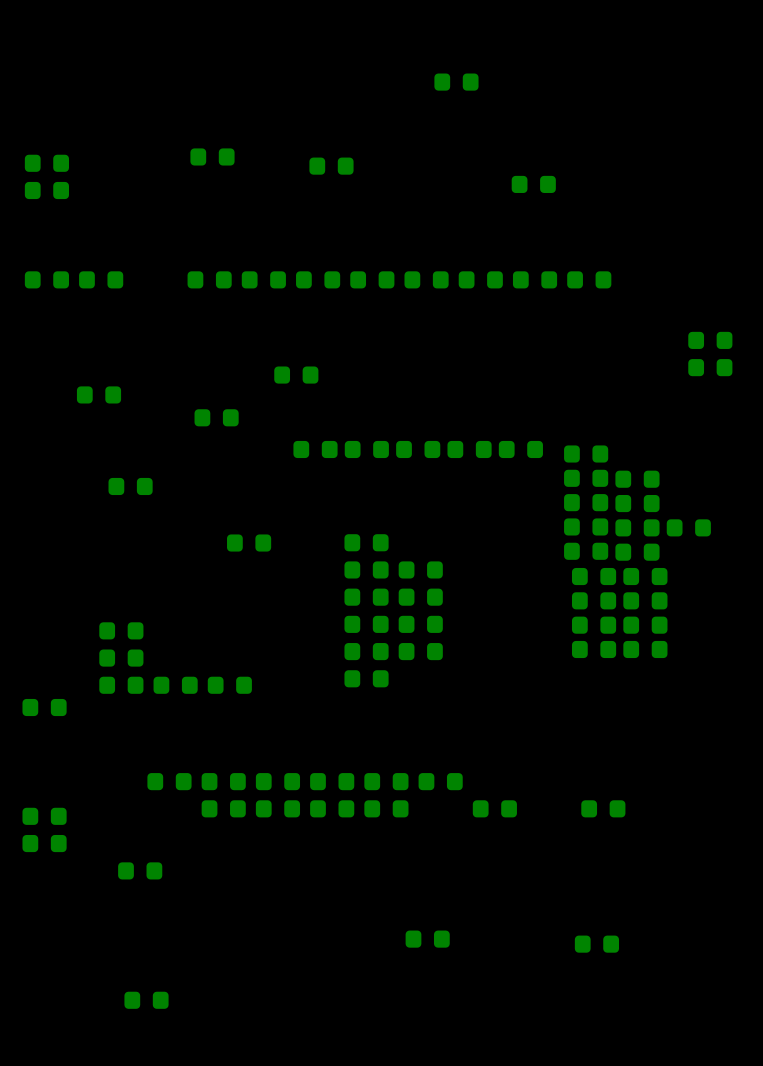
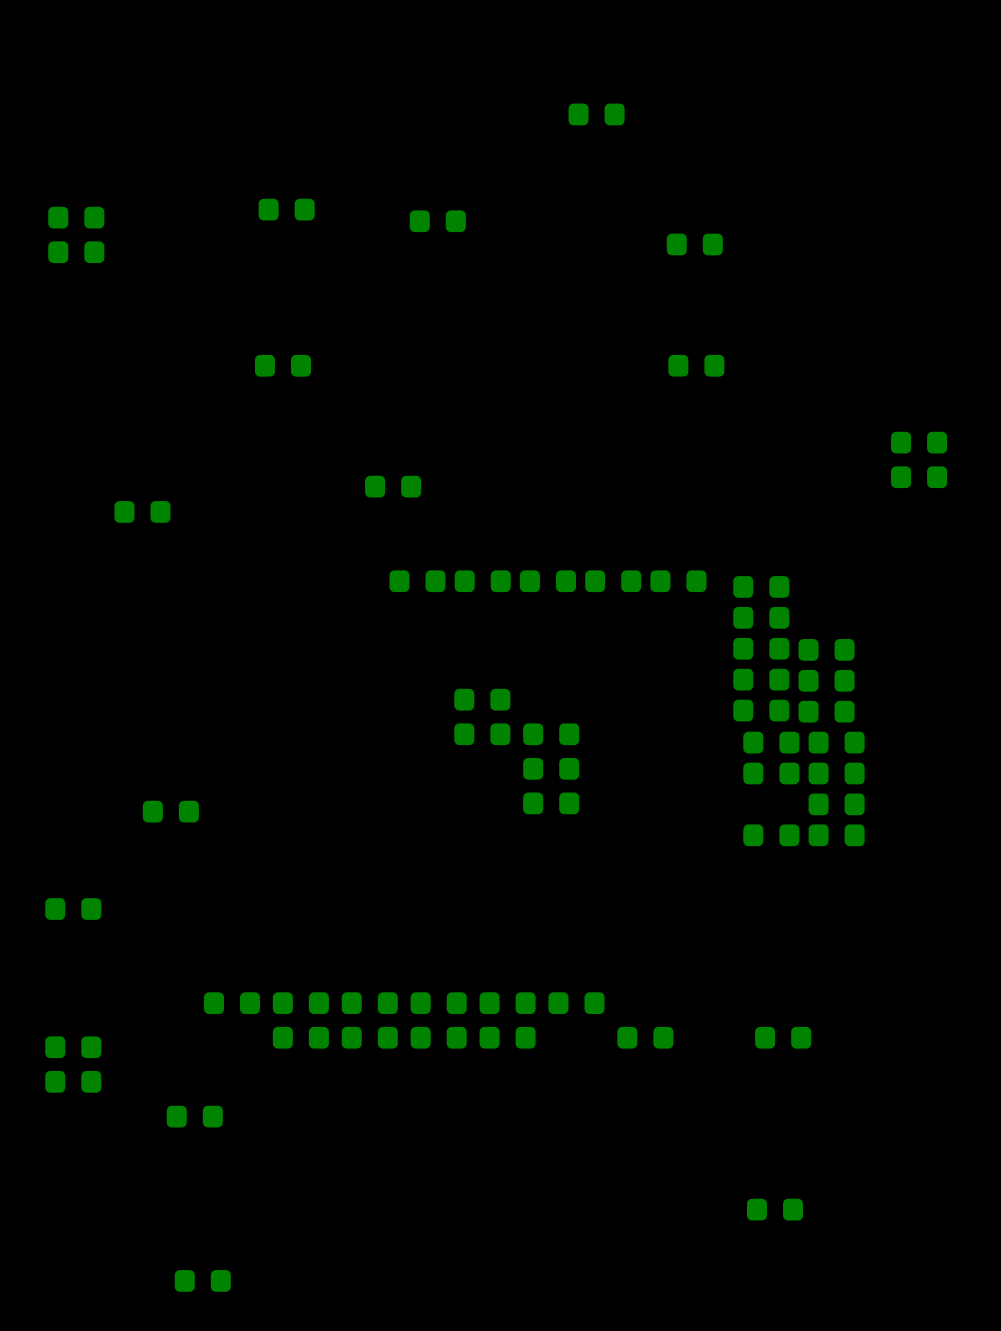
part: (46, 279) -> none
part: (101, 279) -> none
part: (263, 279) -> none
part: (318, 279) -> none
part: (372, 279) -> none
part: (426, 279) -> none
part: (480, 279) -> none
part: (589, 279) -> none
part: (216, 417) -> none
part: (637, 479) -> none
part: (130, 486) -> none
part: (688, 527) -> none
part: (249, 543) -> none
part: (366, 597) -> none
part: (366, 624) -> none
part: (594, 625) -> none
part: (366, 651) -> none
part: (420, 651) -> none
part: (121, 658) -> none
part: (366, 678) -> none
part: (121, 685) -> none
part: (175, 685) -> none
part: (229, 685) -> none
part: (427, 939) -> none

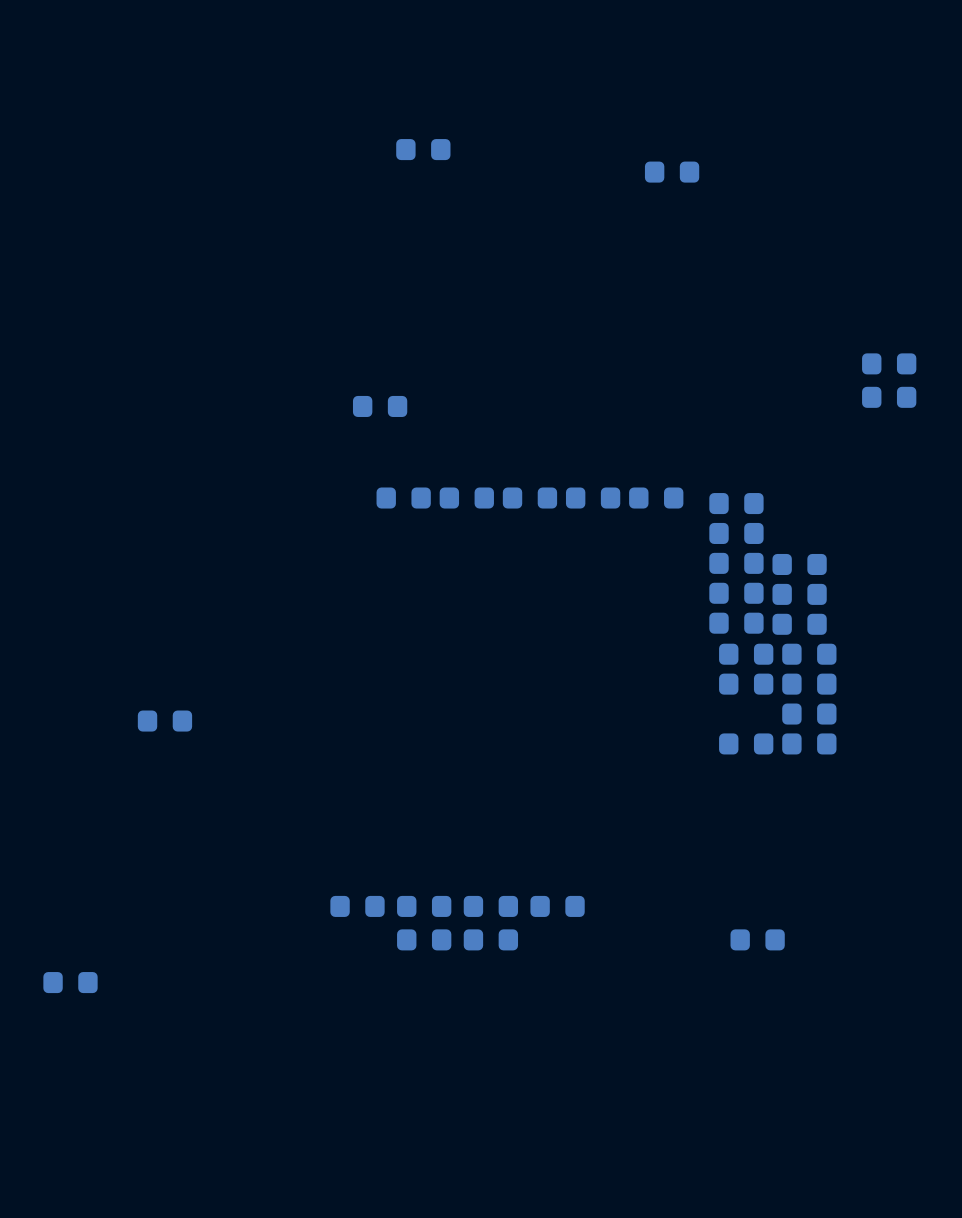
part: (596, 114) -> none
part: (286, 209) -> none
part: (76, 217) -> none
part: (76, 252) -> none
part: (282, 365) -> none
part: (696, 365) -> none
part: (142, 511) -> none
part: (482, 699) -> none
part: (482, 734) -> none
part: (551, 734) -> none
part: (551, 768) -> none
part: (551, 803) -> none
part: (73, 909) -> none
part: (231, 1003) -> none
part: (300, 1003) -> none
part: (300, 1037) -> none
part: (369, 1037) -> none
part: (645, 1037) -> none
part: (73, 1047) -> none
part: (194, 1116) -> none
part: (775, 1209) -> none
part: (202, 1280) -> none

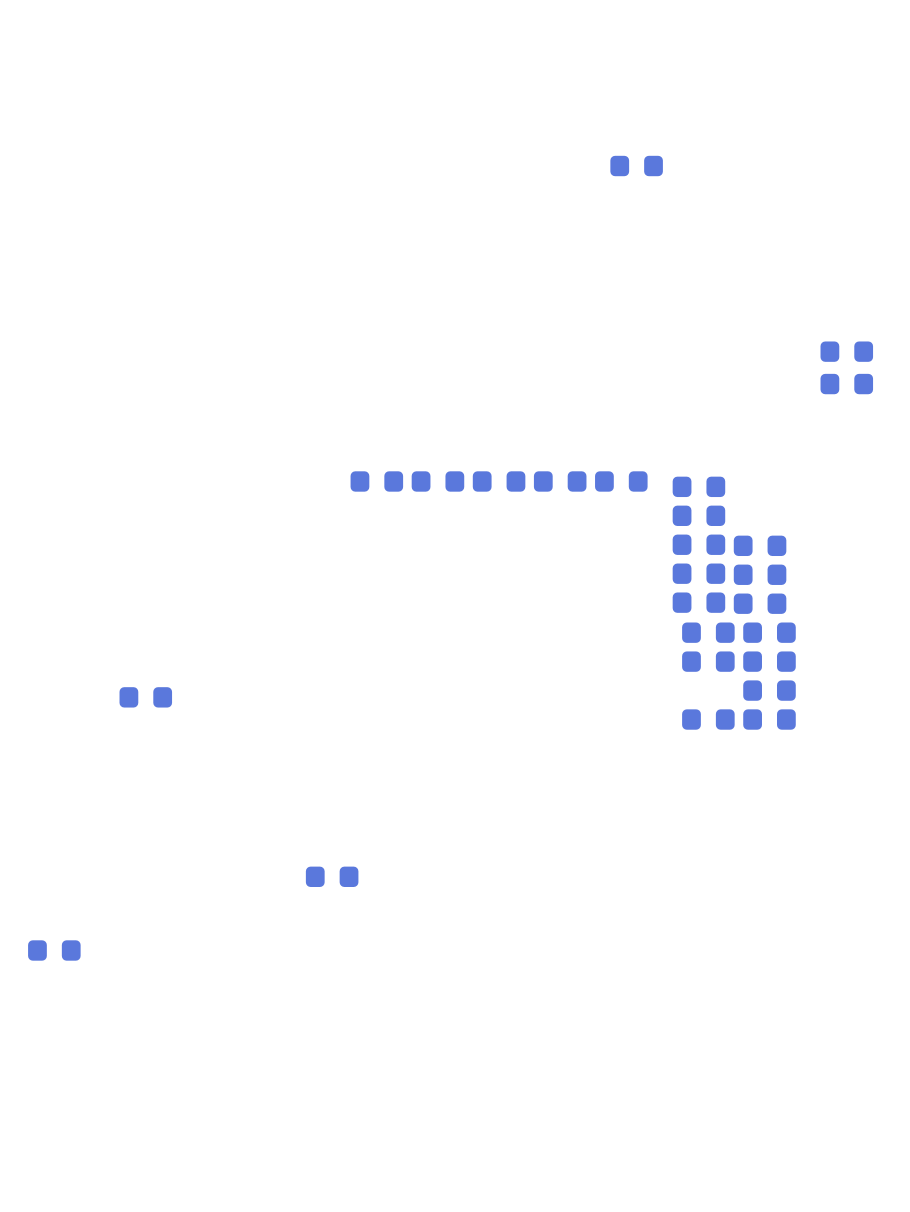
part: (423, 149) -> none
part: (380, 406) -> none
part: (424, 906) -> none
part: (490, 906) -> none
part: (557, 906) -> none
part: (424, 939) -> none
part: (490, 939) -> none
part: (757, 939) -> none

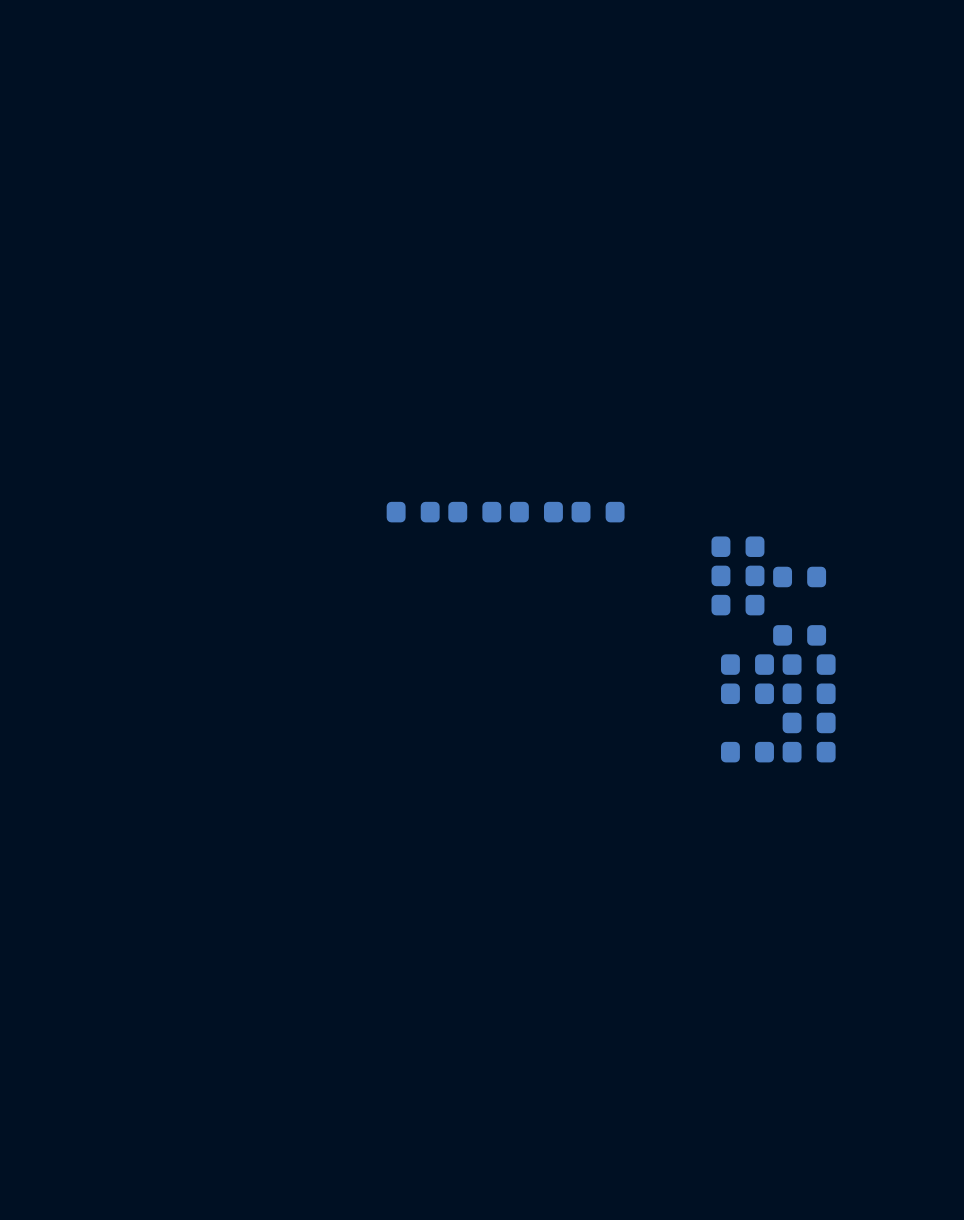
part: (636, 166) -> none
part: (846, 351) -> none
part: (846, 384) -> none
part: (621, 481) -> none
part: (698, 486) -> none
part: (760, 574) -> none
part: (698, 602) -> none
part: (145, 697) -> none
part: (332, 876) -> none
part: (54, 950) -> none

